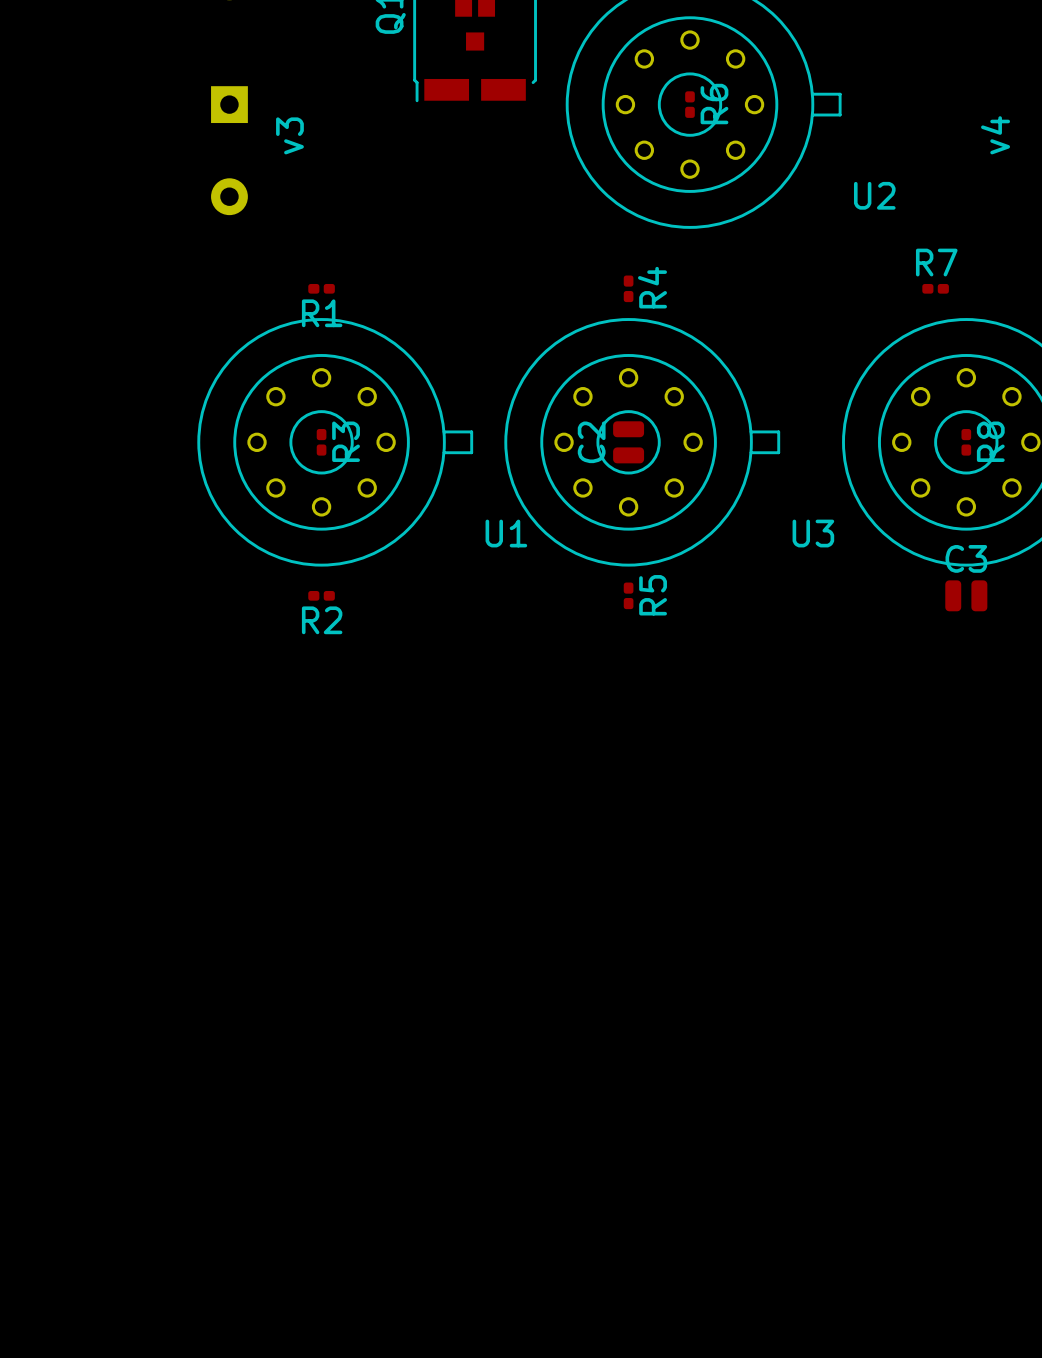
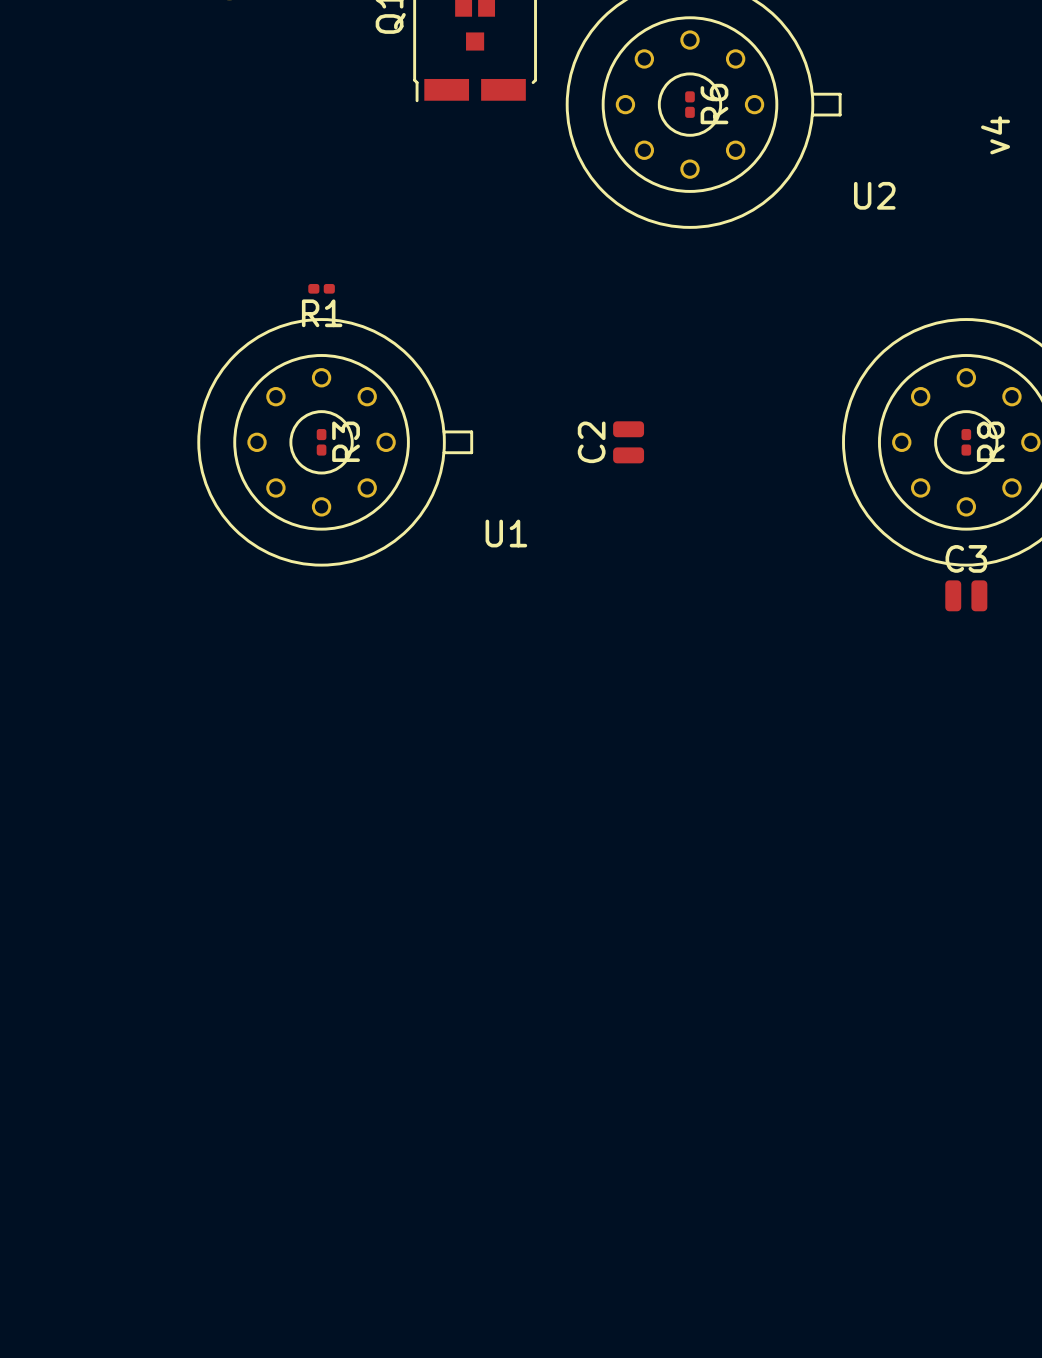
v3: (229, 150) -> none
R4: (628, 288) -> none
R7: (935, 288) -> none
U3: (642, 442) -> none
R2: (321, 595) -> none
R5: (628, 595) -> none

